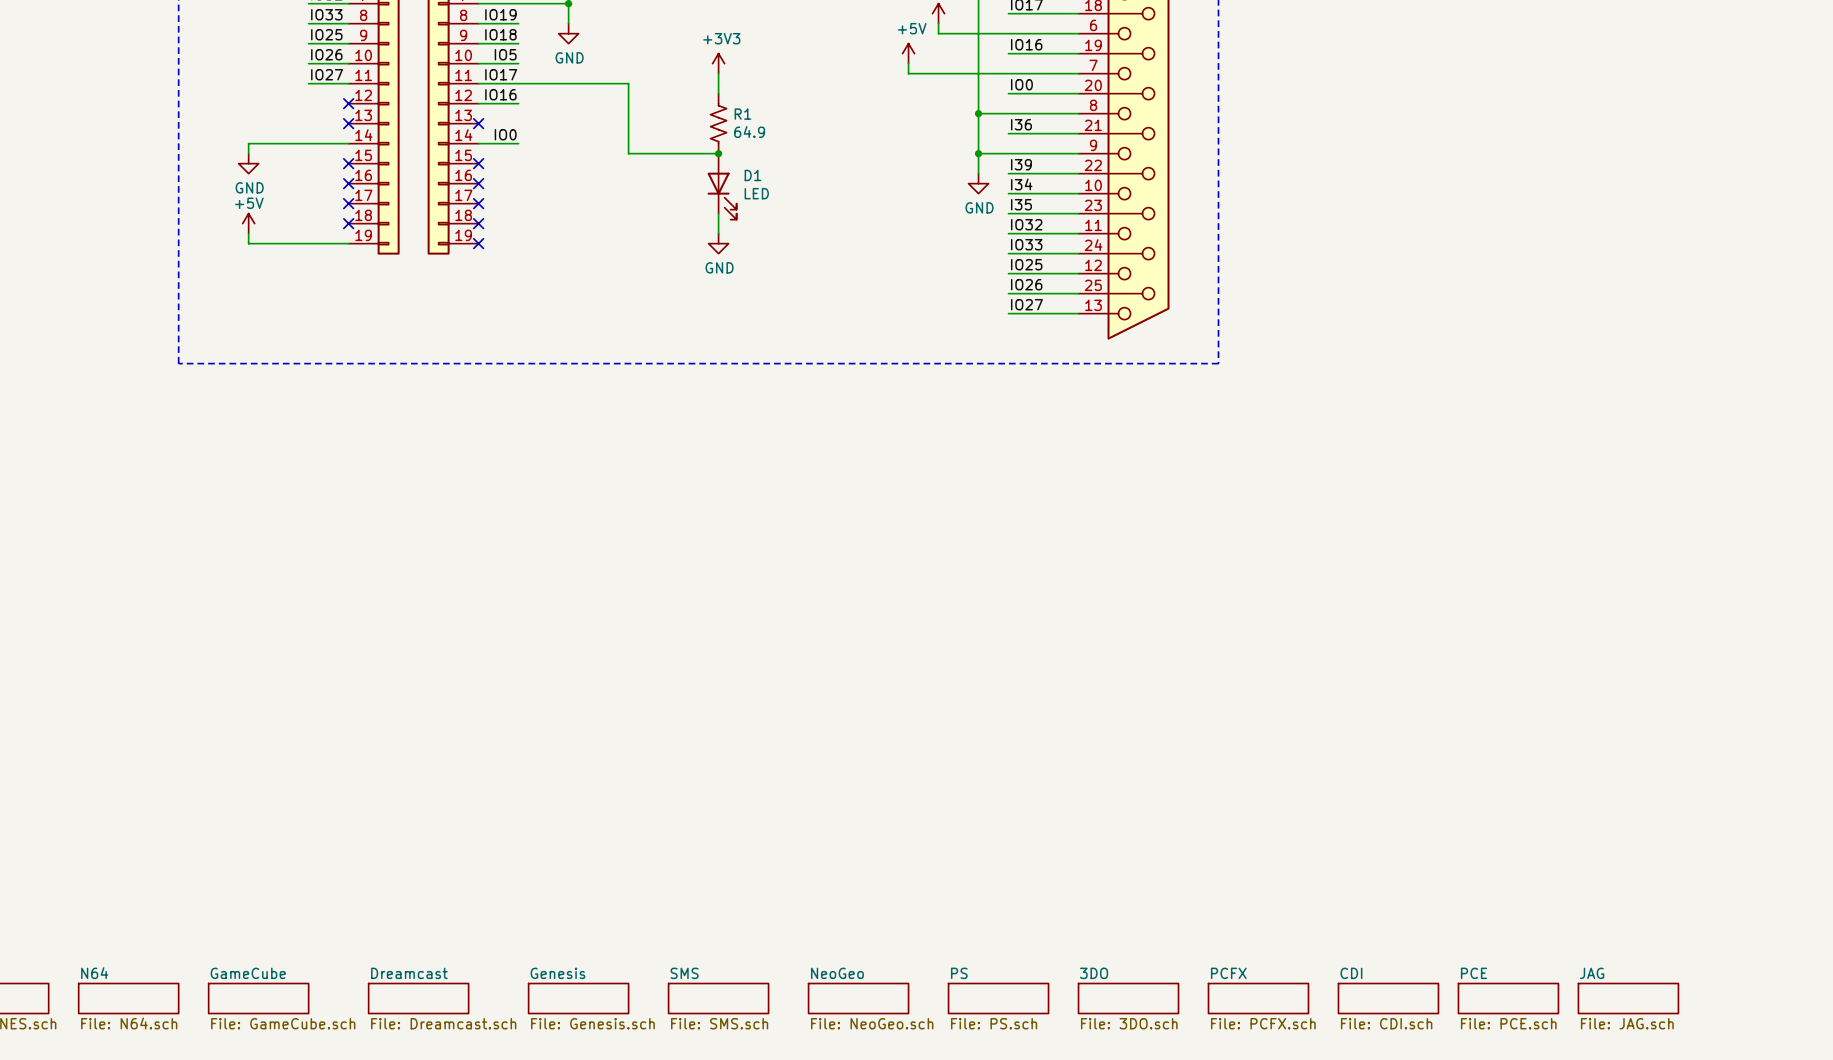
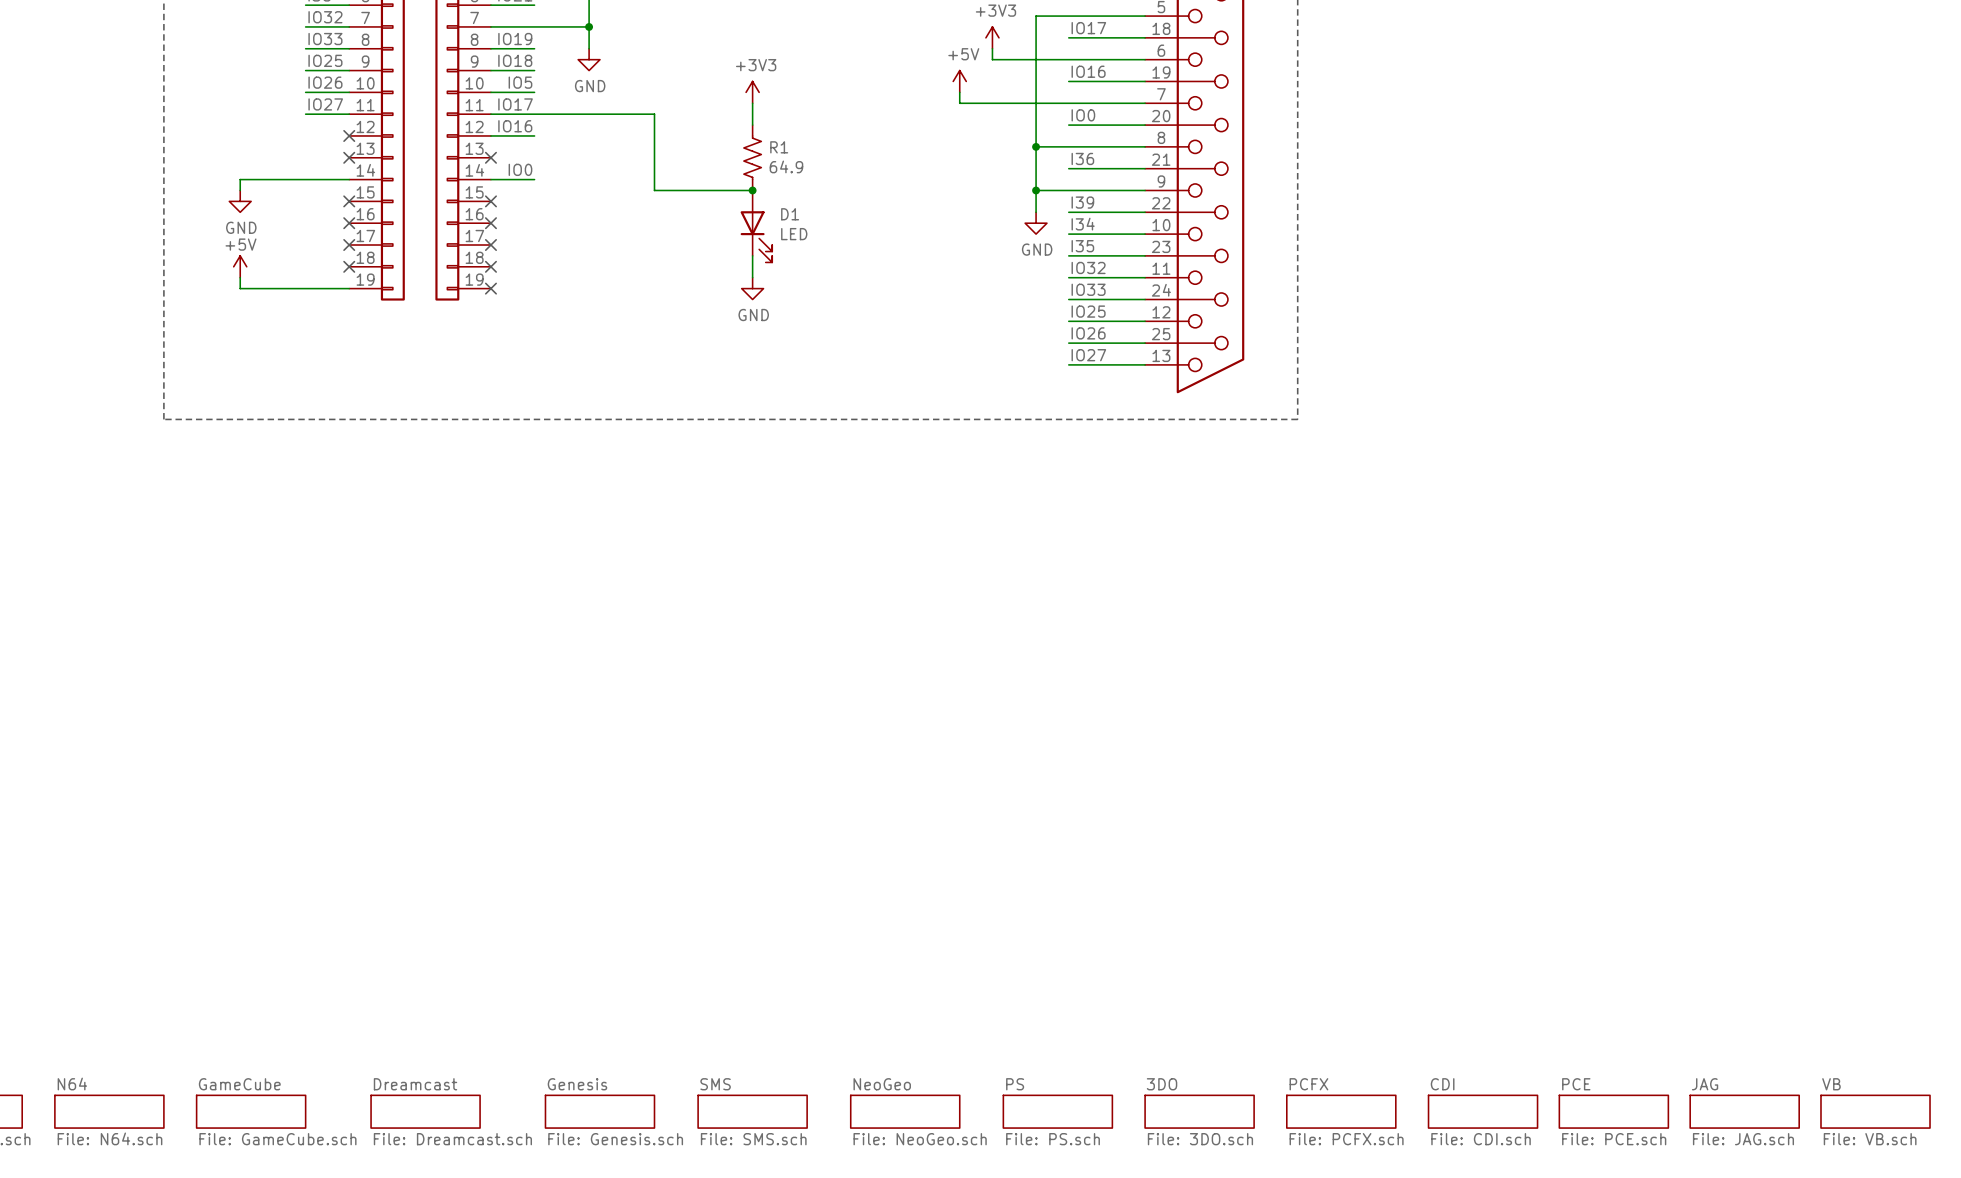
sheet VB: none -> File: VB.sch (1875, 1111)

